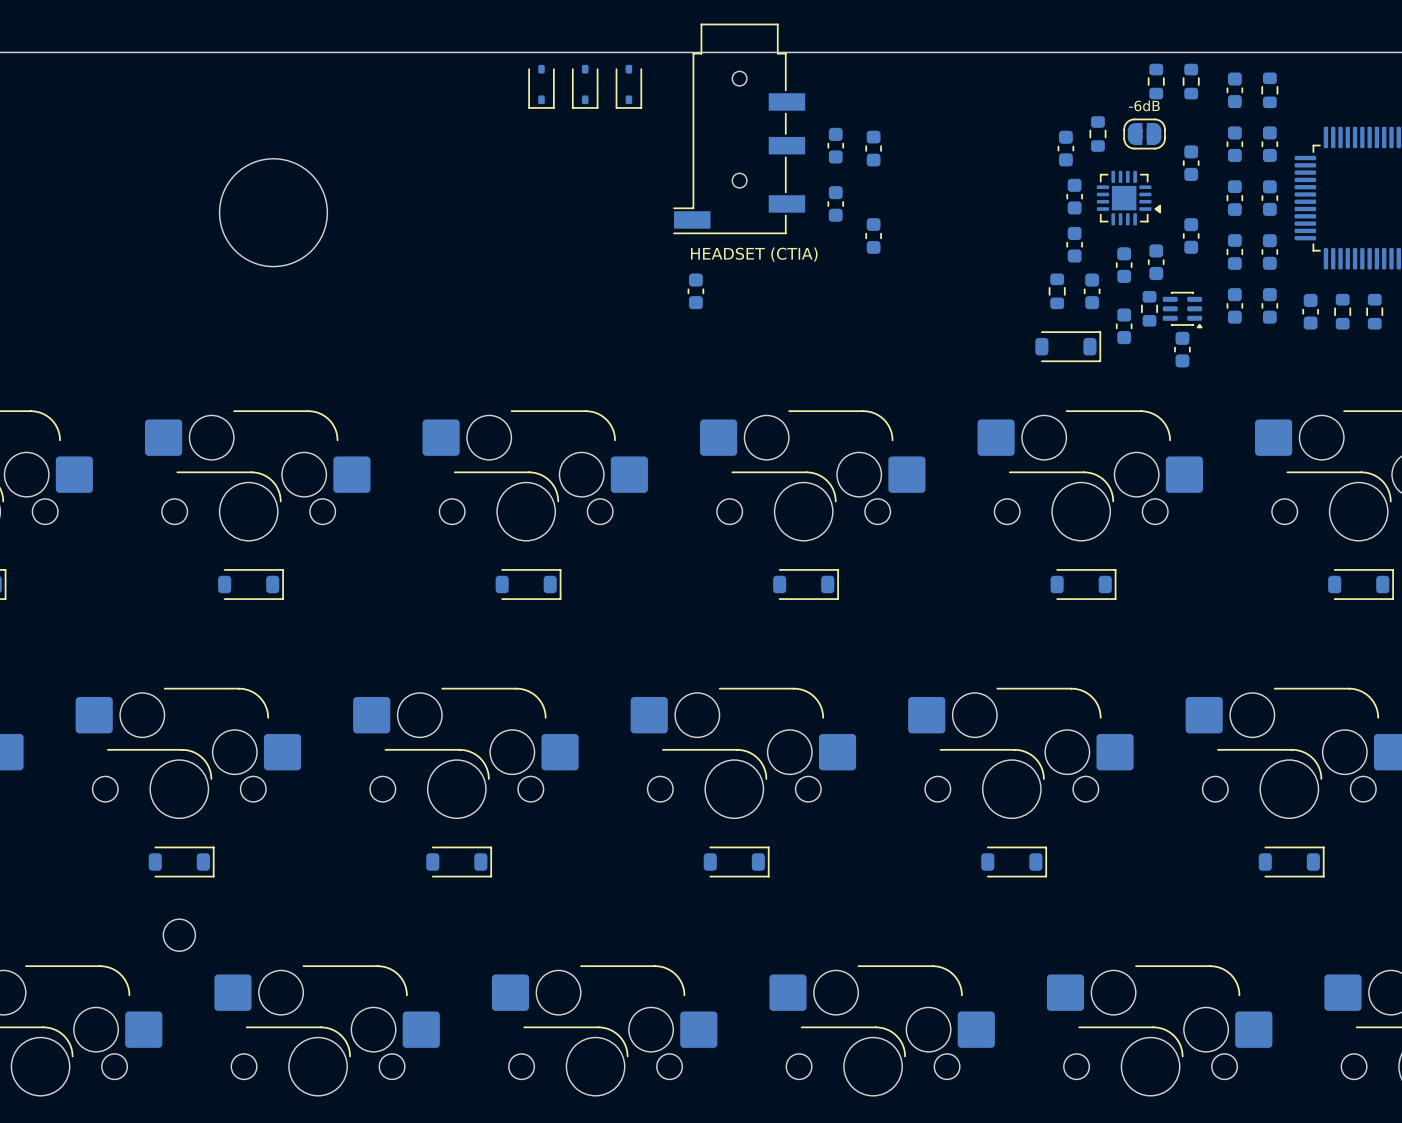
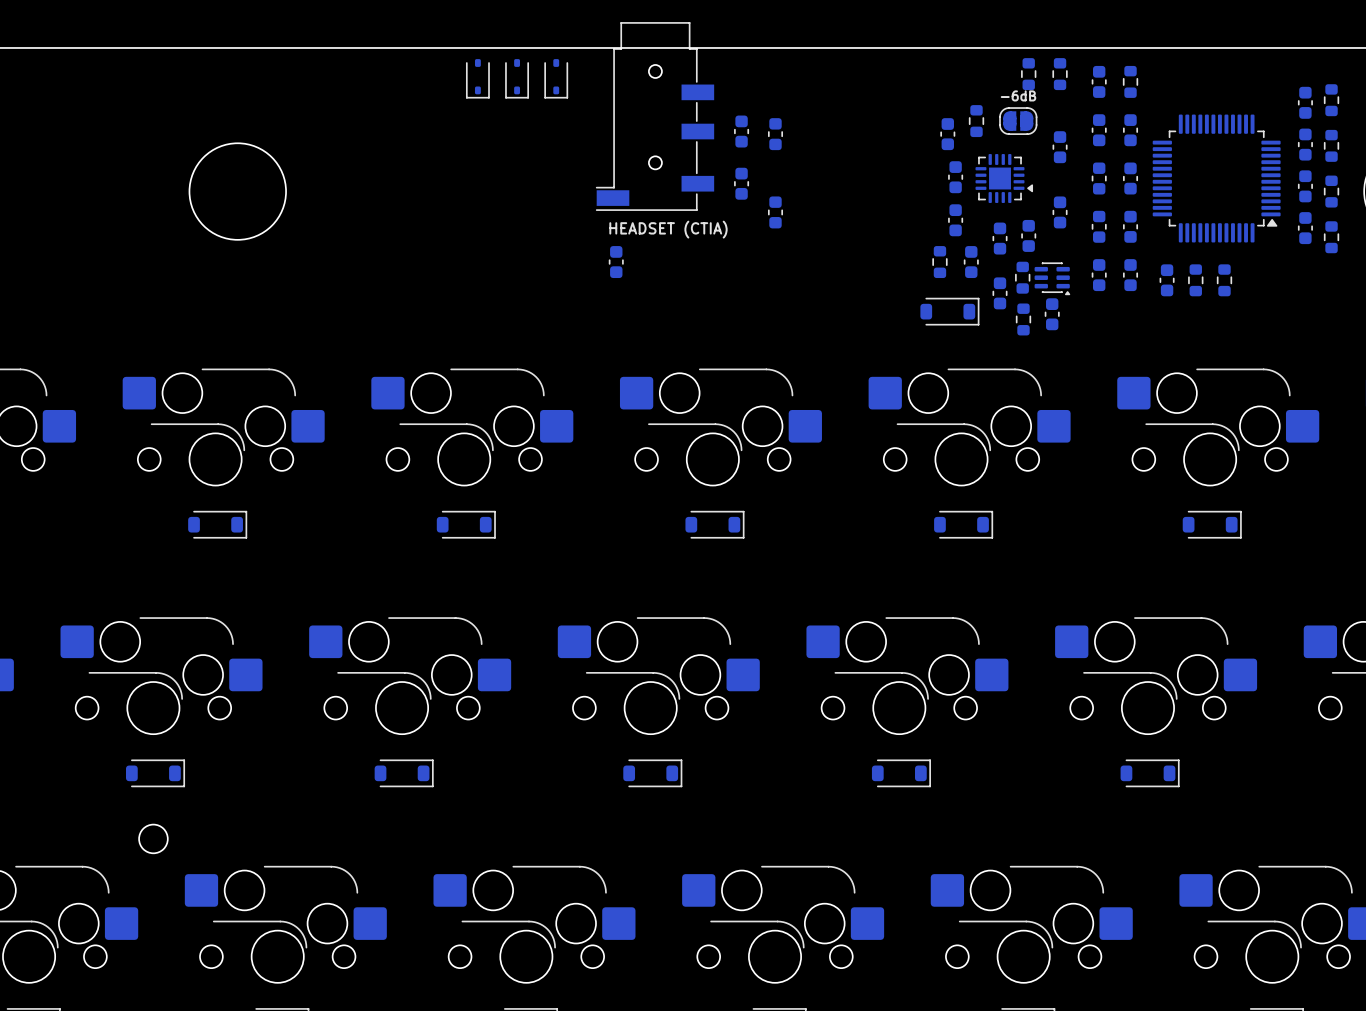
part: none -> (1023, 319)

